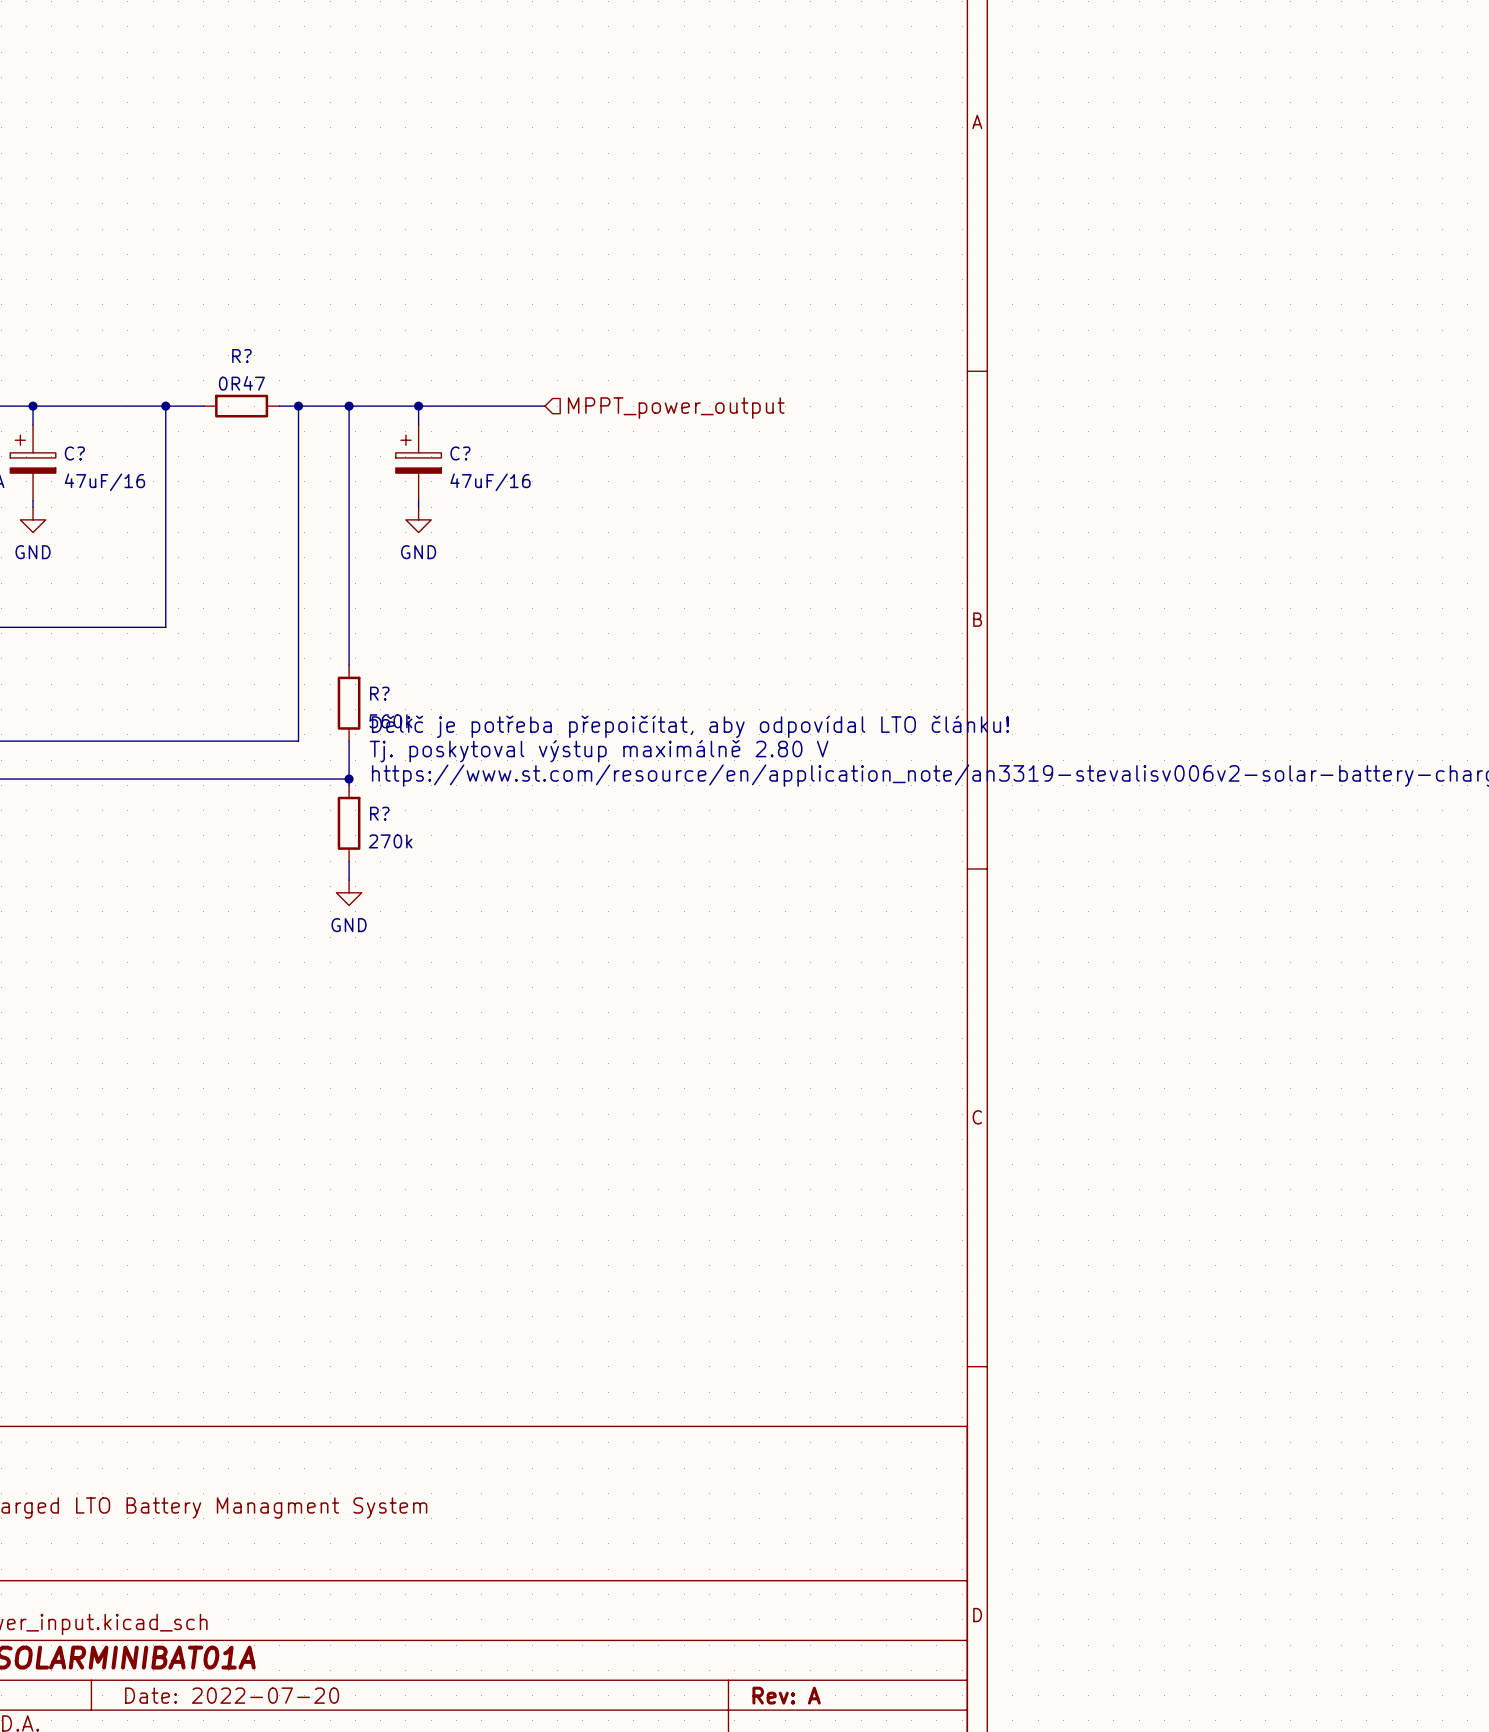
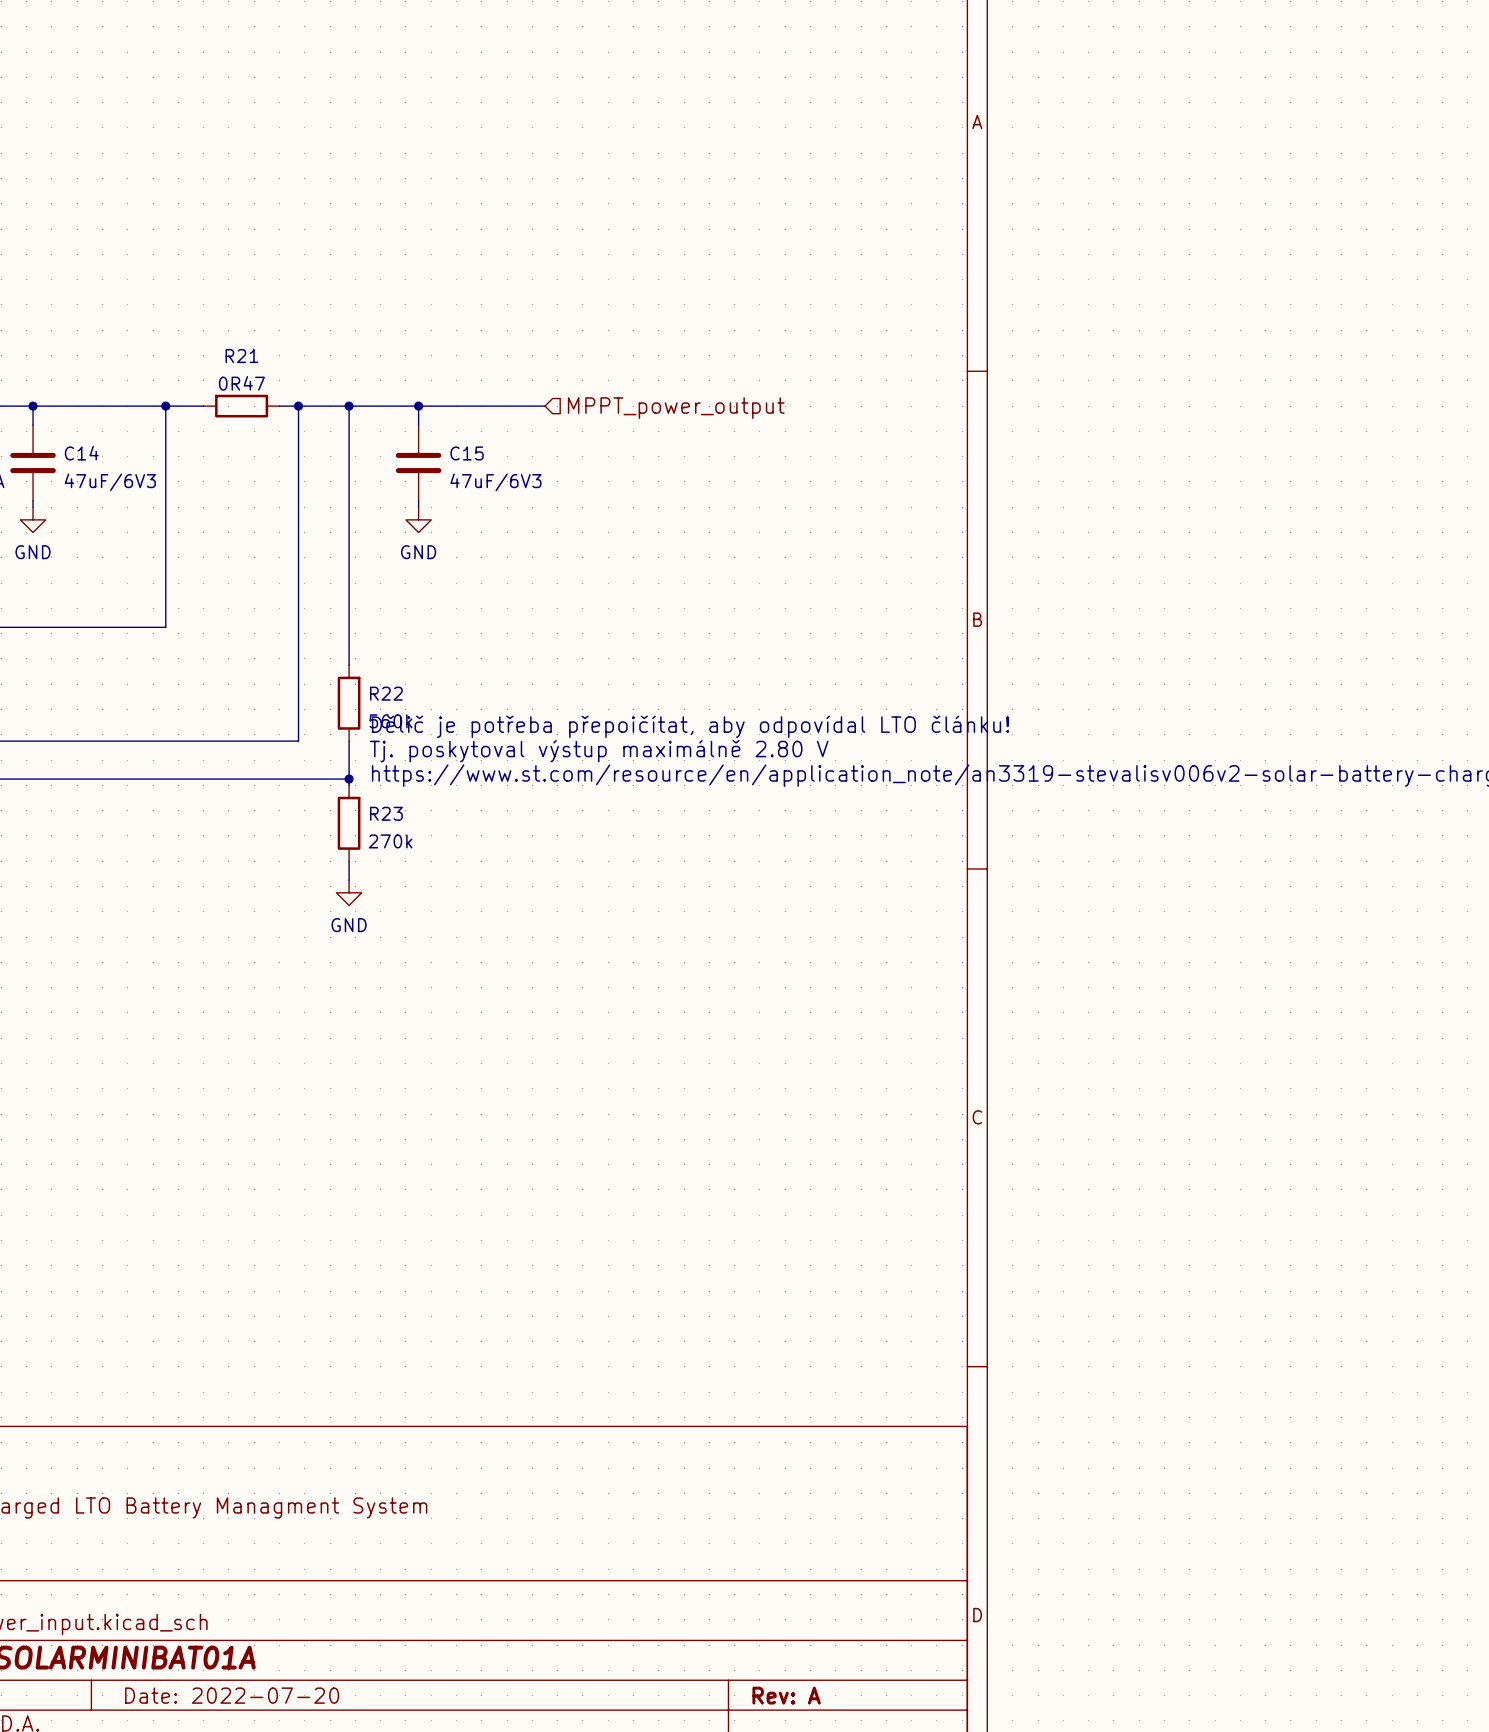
R? name: R? (241, 356) -> R21 (241, 356)
C?: 47uF/16 (33, 463) -> none
C14: none -> 47uF/6V3 (33, 463)
C?: 47uF/16 (418, 463) -> none
C15: none -> 47uF/6V3 (418, 463)
R? name: R? (379, 693) -> R22 (386, 693)
R? name: R? (379, 813) -> R23 (386, 813)

